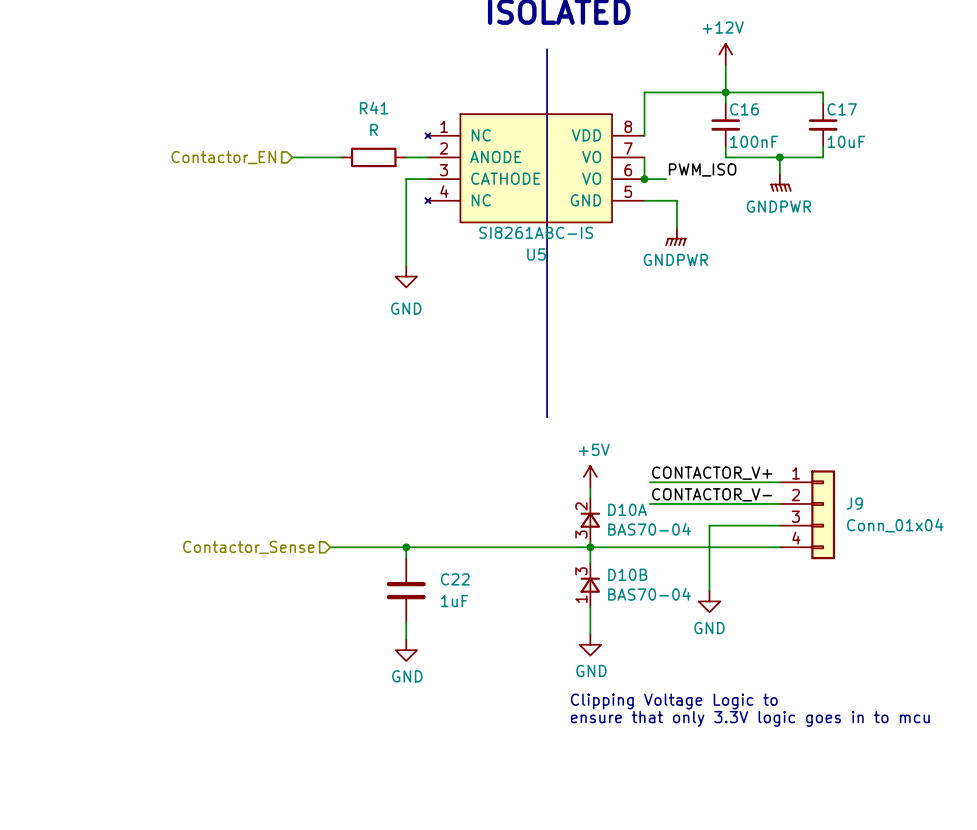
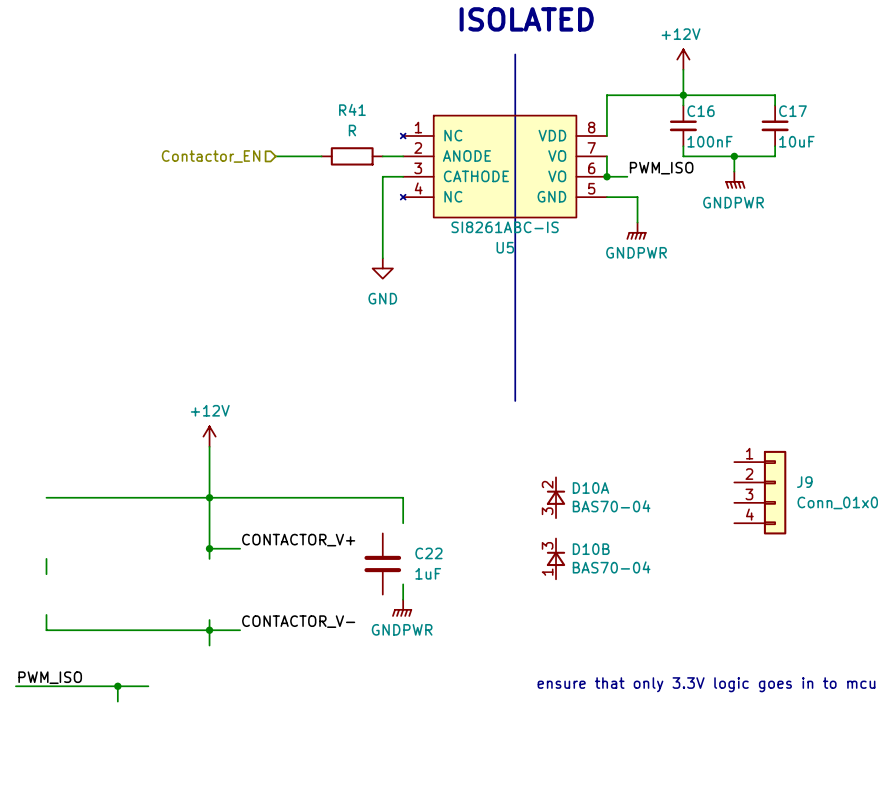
power symbol: none -> +12V (209, 436)
wire: none -> (209, 446) (209, 558)
label: CONTACTOR_V+ (712, 473) -> none
power symbol: +5V (590, 476) -> none
wire: (649, 482) (779, 482) -> none
wire: (590, 487) (590, 498) -> none
label: CONTACTOR_V- (712, 494) -> none
wire: (649, 503) (779, 503) -> none
wire: none -> (46, 497) (403, 497) (403, 523)
junction: none -> (209, 497)
wire: (779, 525) (709, 525) (709, 590) -> none
wire: (590, 541) (590, 563) -> none
hierarchical label: Contactor_Sense (248, 547) -> none
wire: (330, 547) (779, 547) -> none
wire: (406, 547) (406, 558) -> none
junction: (406, 547) -> none
junction: (590, 547) -> none
label: none -> CONTACTOR_V+ (298, 540)
wire: none -> (209, 548) (240, 548)
junction: none -> (209, 548)
wire: none -> (46, 558) (46, 574)
power symbol: GND (709, 601) -> none
wire: (590, 606) (590, 633) -> none
wire: (406, 623) (406, 639) -> (403, 584) (403, 599)
power symbol: none -> GNDPWR (402, 608)
wire: none -> (46, 614) (46, 630) (240, 630)
power symbol: GND (590, 644) -> none
wire: none -> (209, 620) (209, 645)
power symbol: GND (406, 650) -> none
label: none -> CONTACTOR_V- (298, 621)
junction: none -> (209, 630)
text: Clipping Voltage Logic to (674, 701) -> none
label: none -> PWM_ISO (50, 677)
wire: none -> (15, 686) (148, 686)
wire: none -> (117, 686) (117, 701)
junction: none -> (117, 686)

